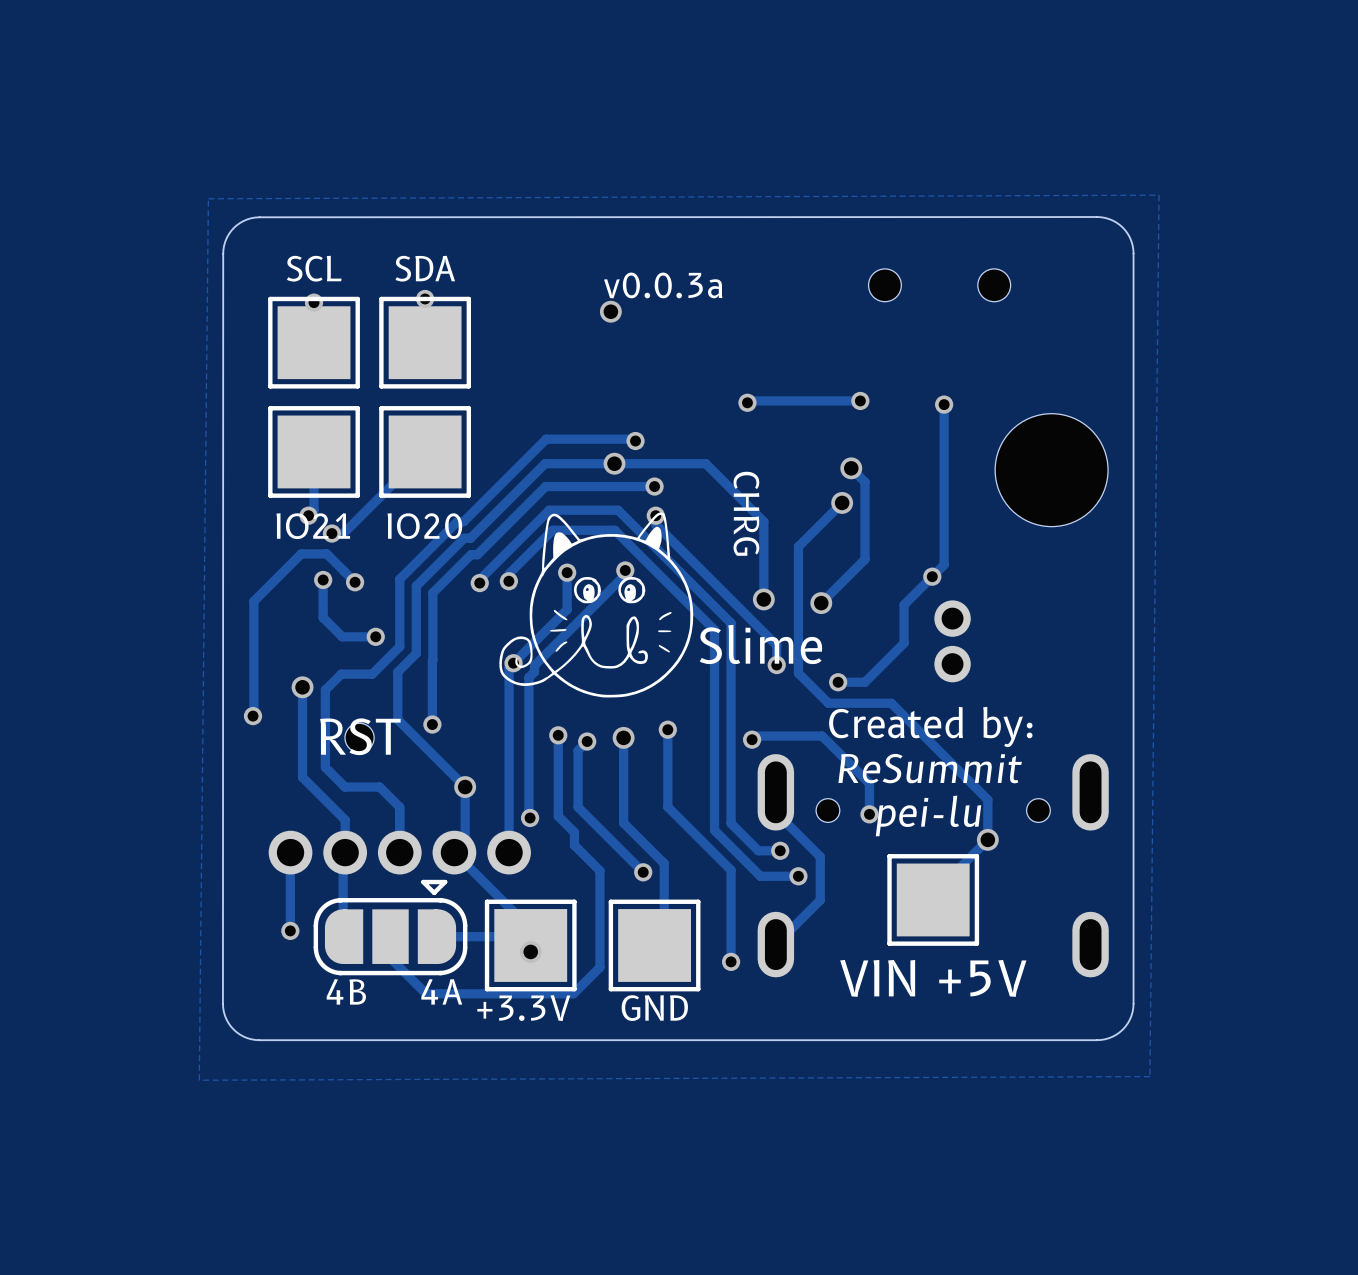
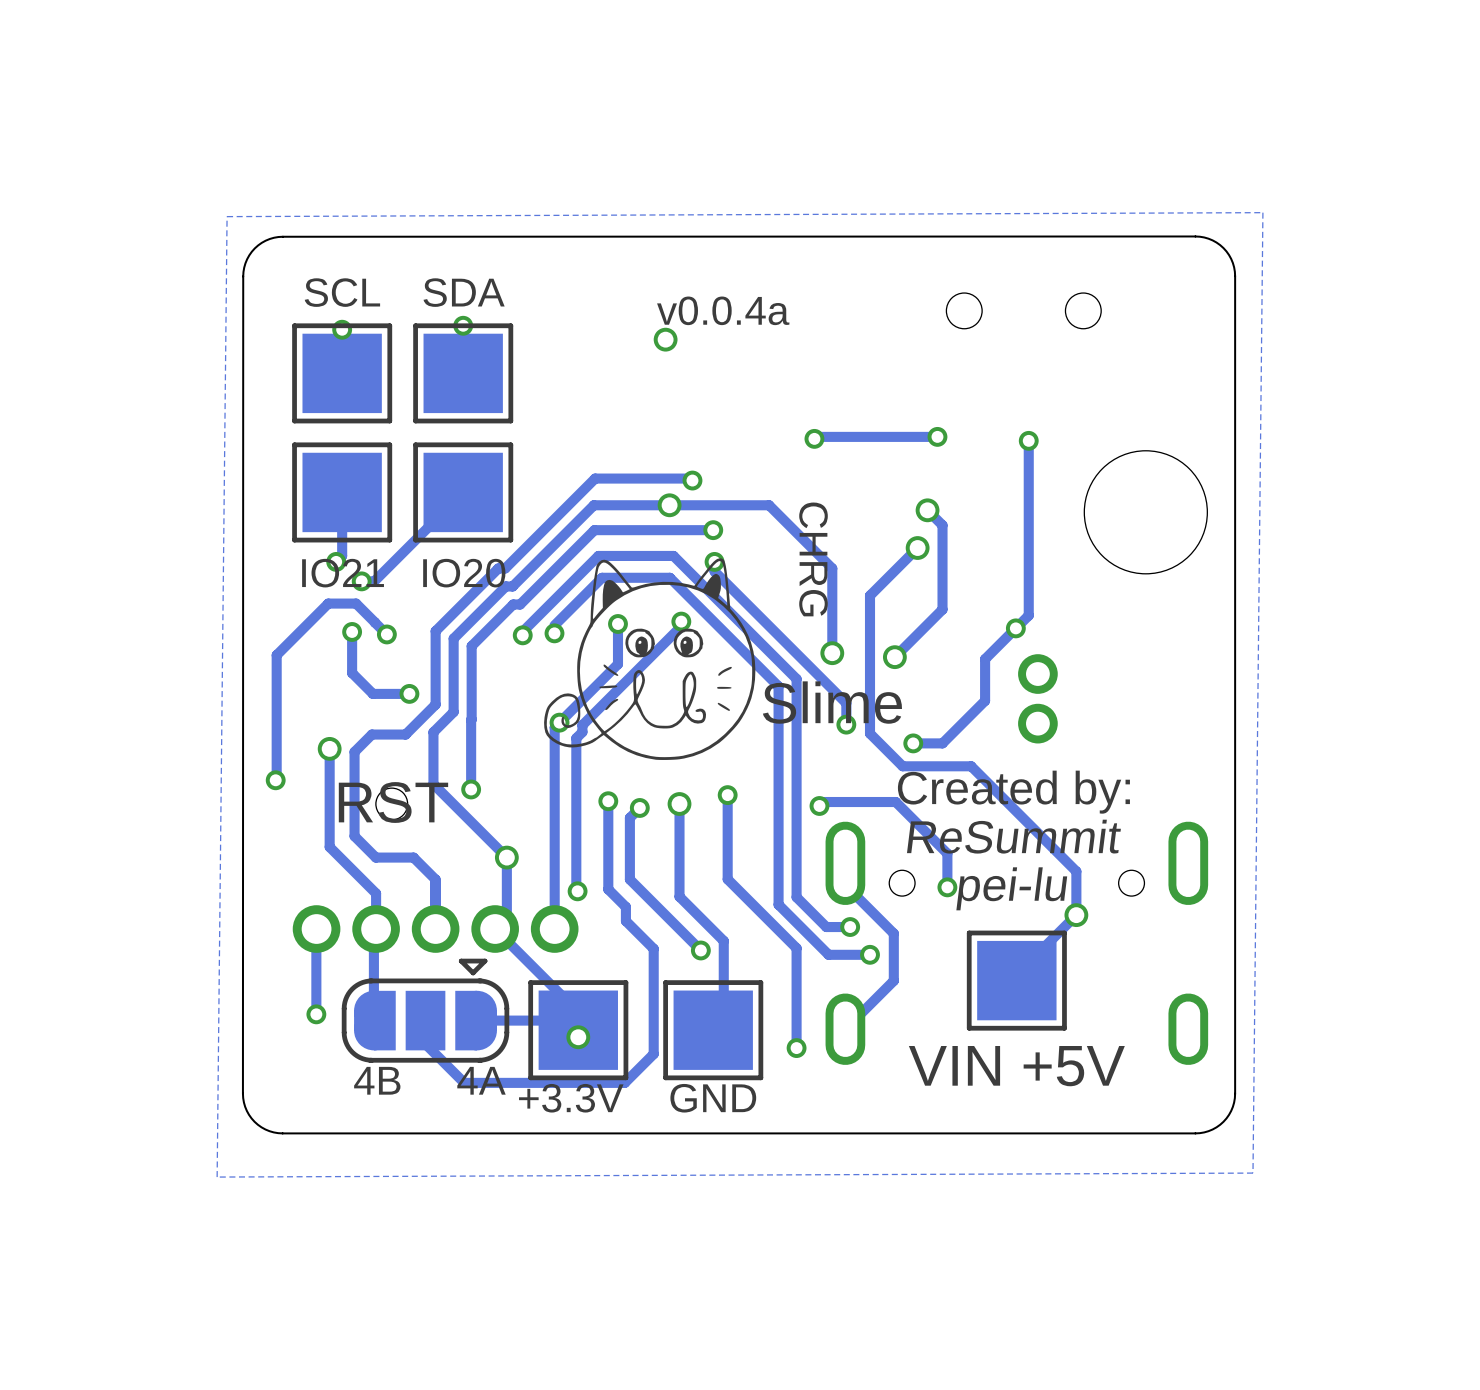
text: v0.0.3a (663, 285) -> v0.0.4a (723, 310)

